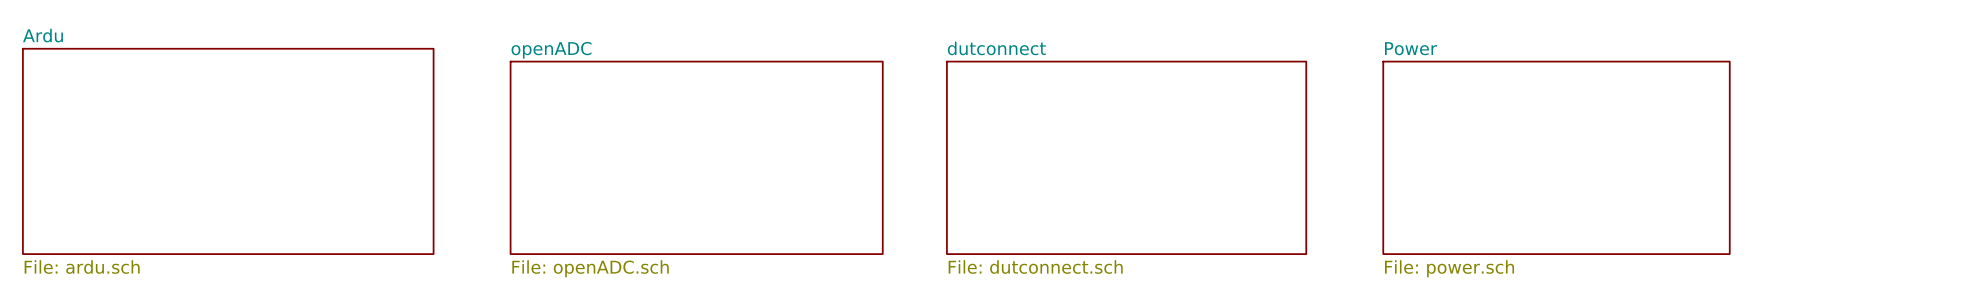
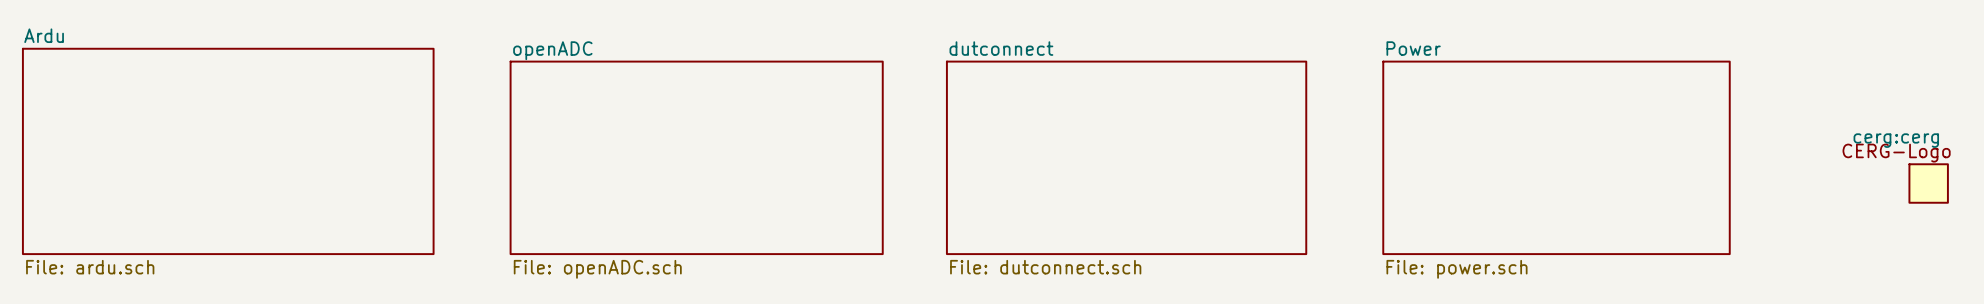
power symbol: none -> (1928, 183)

